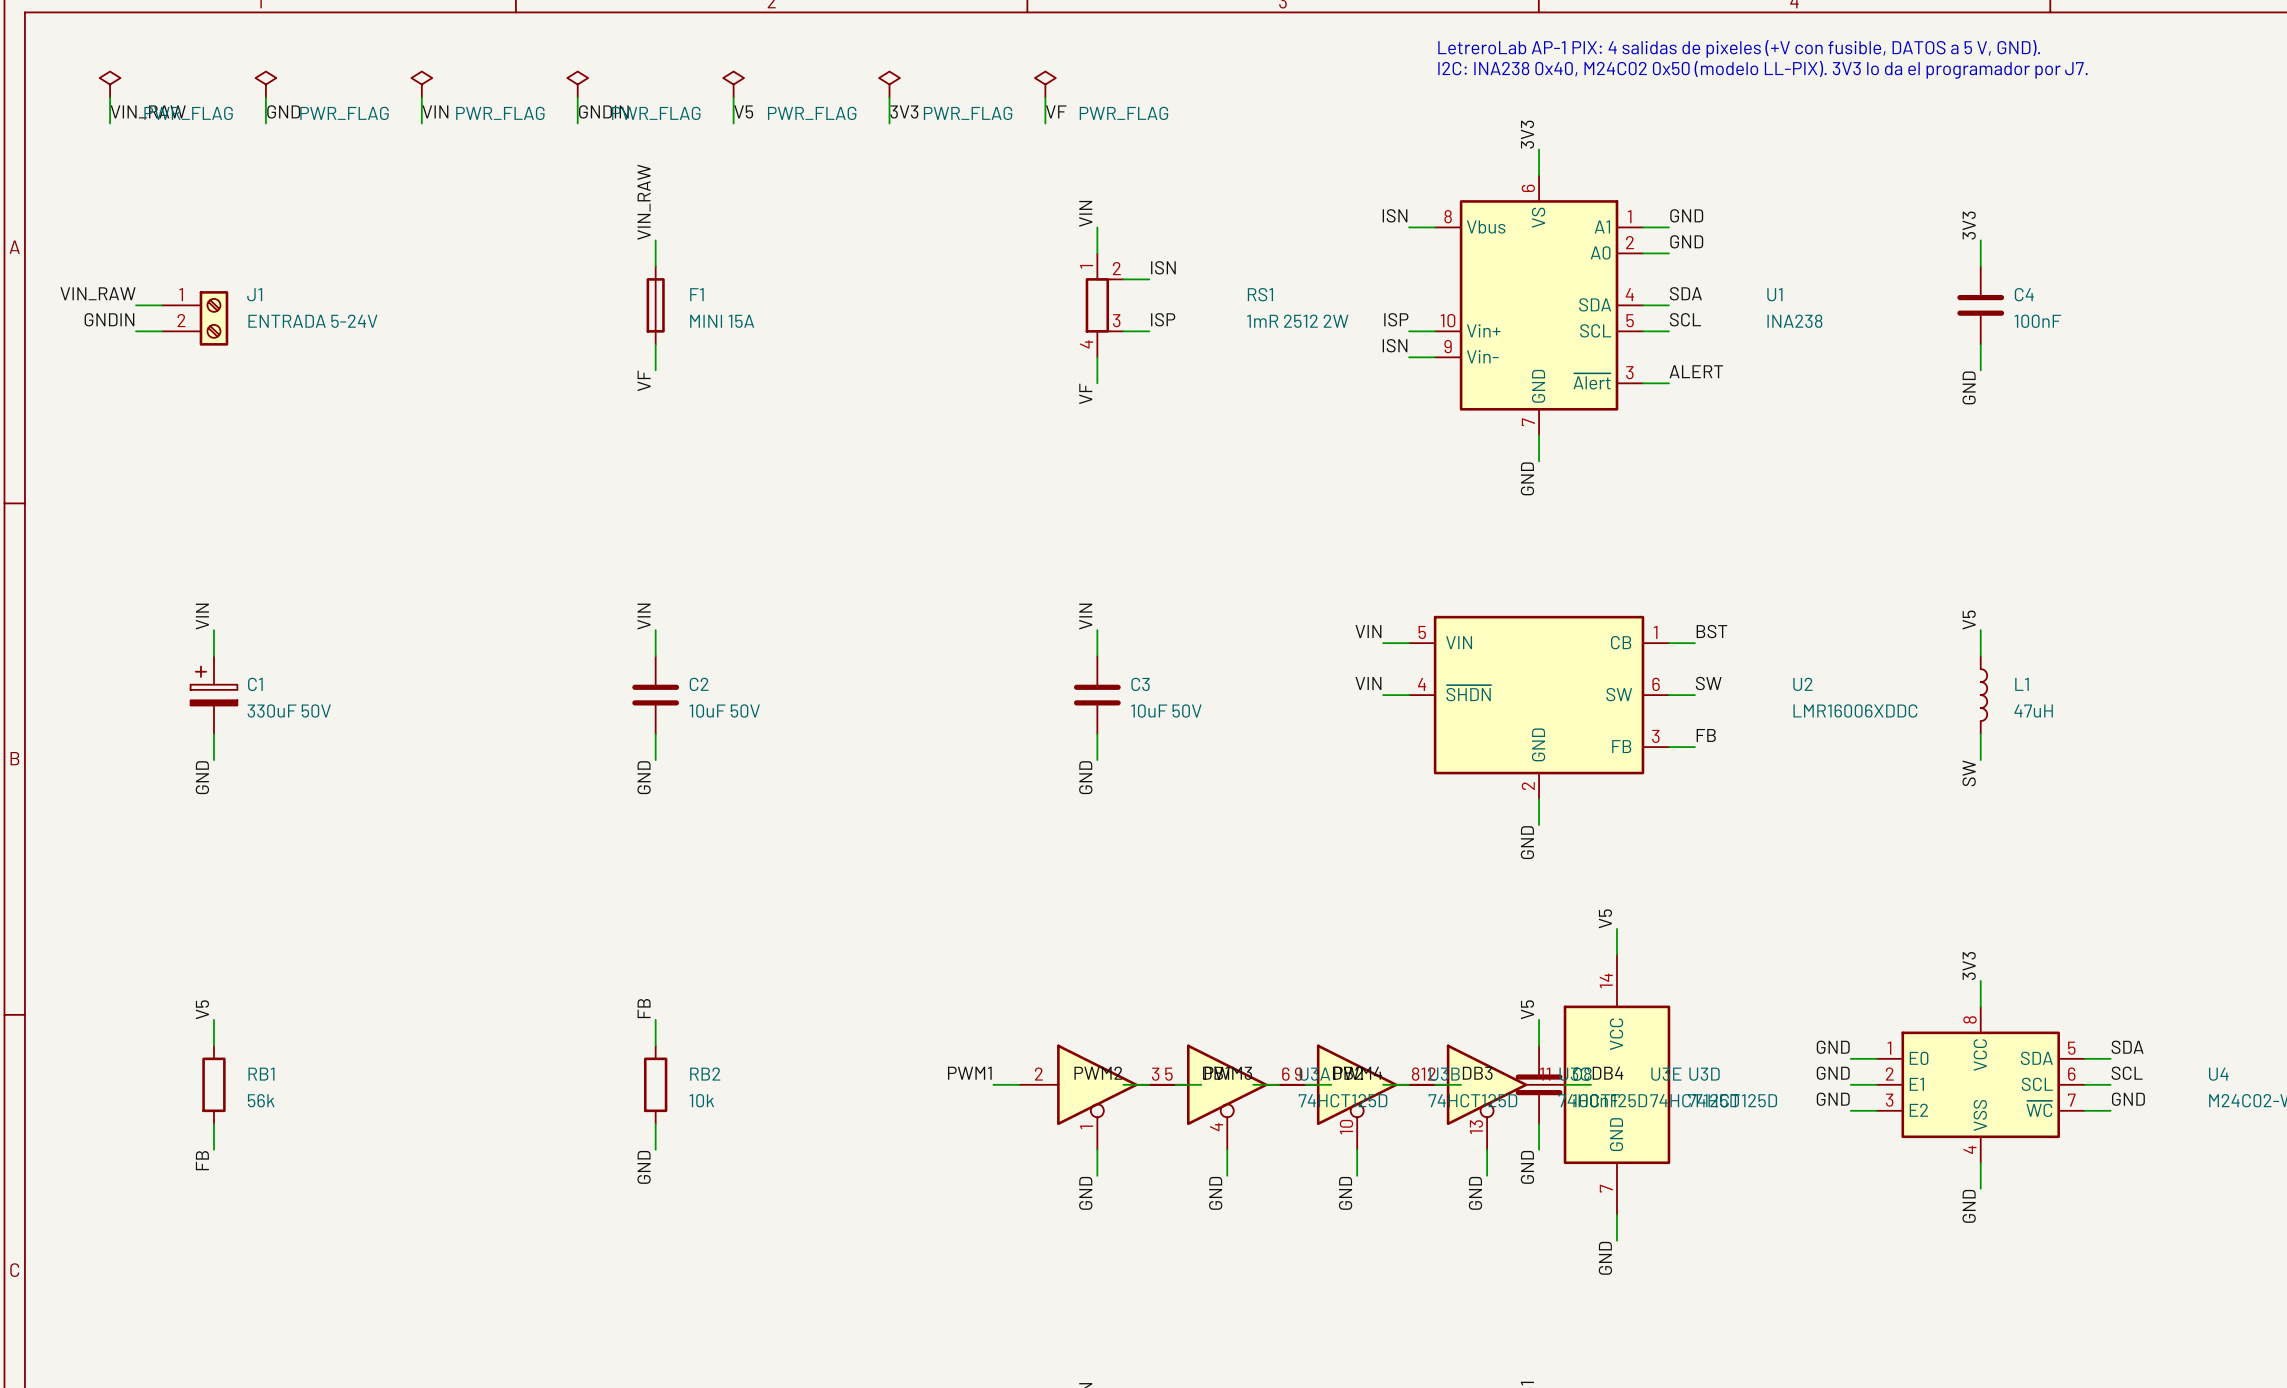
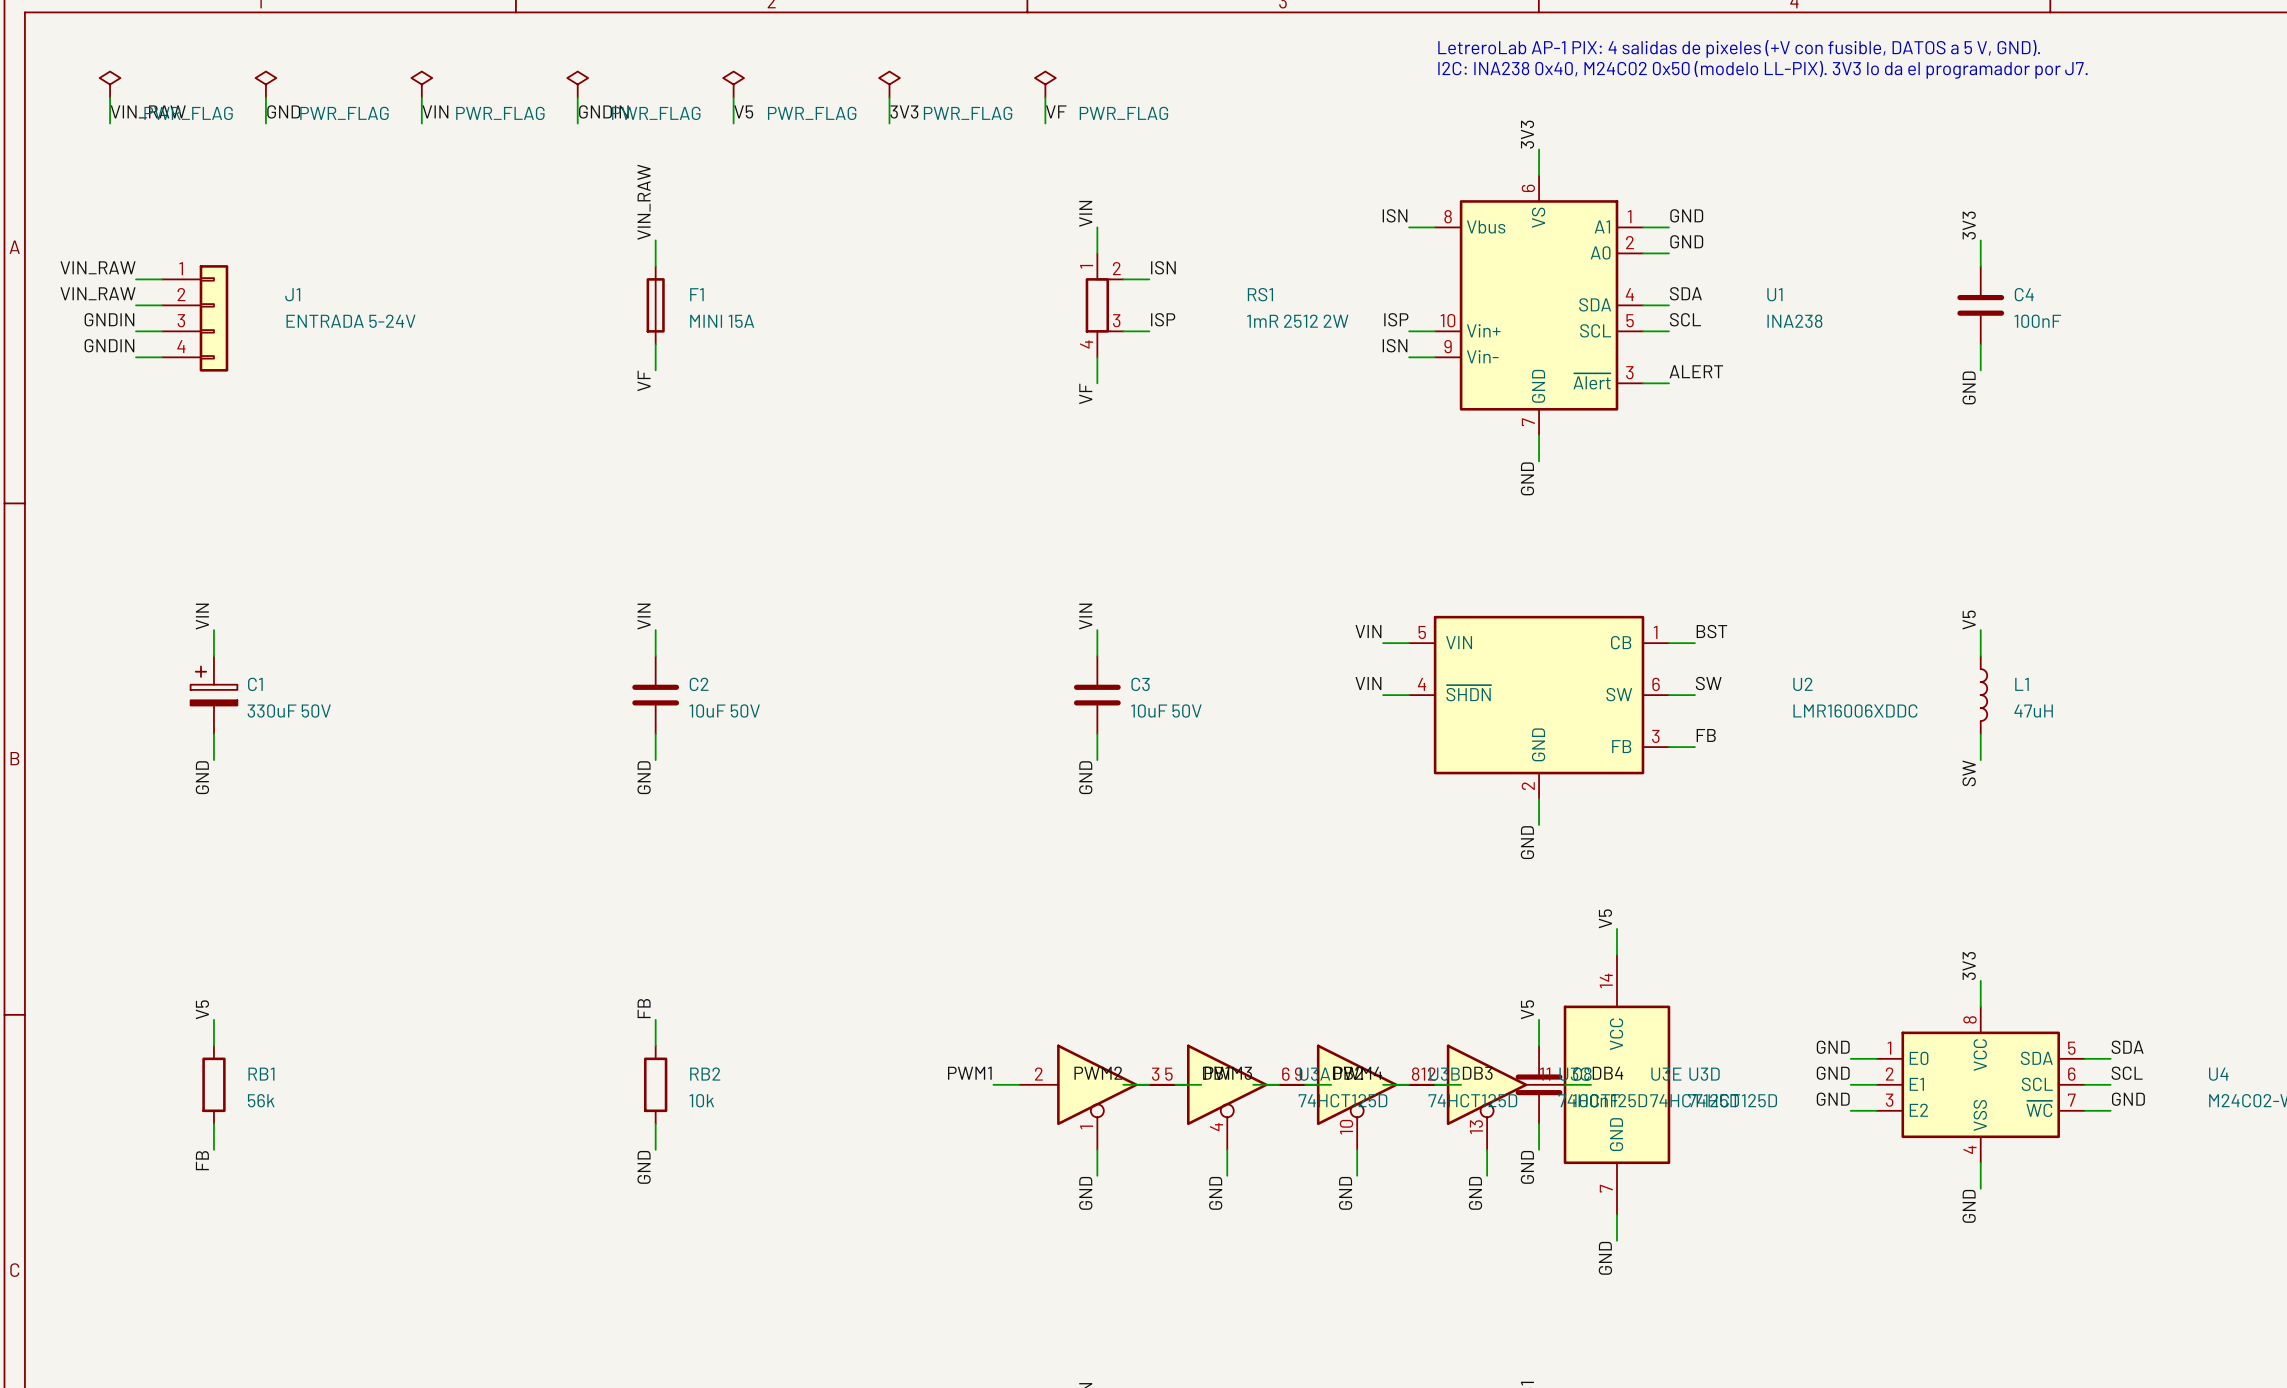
label: none -> VIN_RAW (98, 267)
wire: none -> (136, 279) (162, 279)
J1 symbol: [162, 291, 229, 346] -> [162, 265, 229, 372]
J1 name position: J1 (254, 294) -> J1 (292, 294)
J1 value position: ENTRADA 5-24V (312, 321) -> ENTRADA 5-24V (351, 321)
label: none -> GNDIN (109, 345)
wire: none -> (136, 357) (162, 357)

